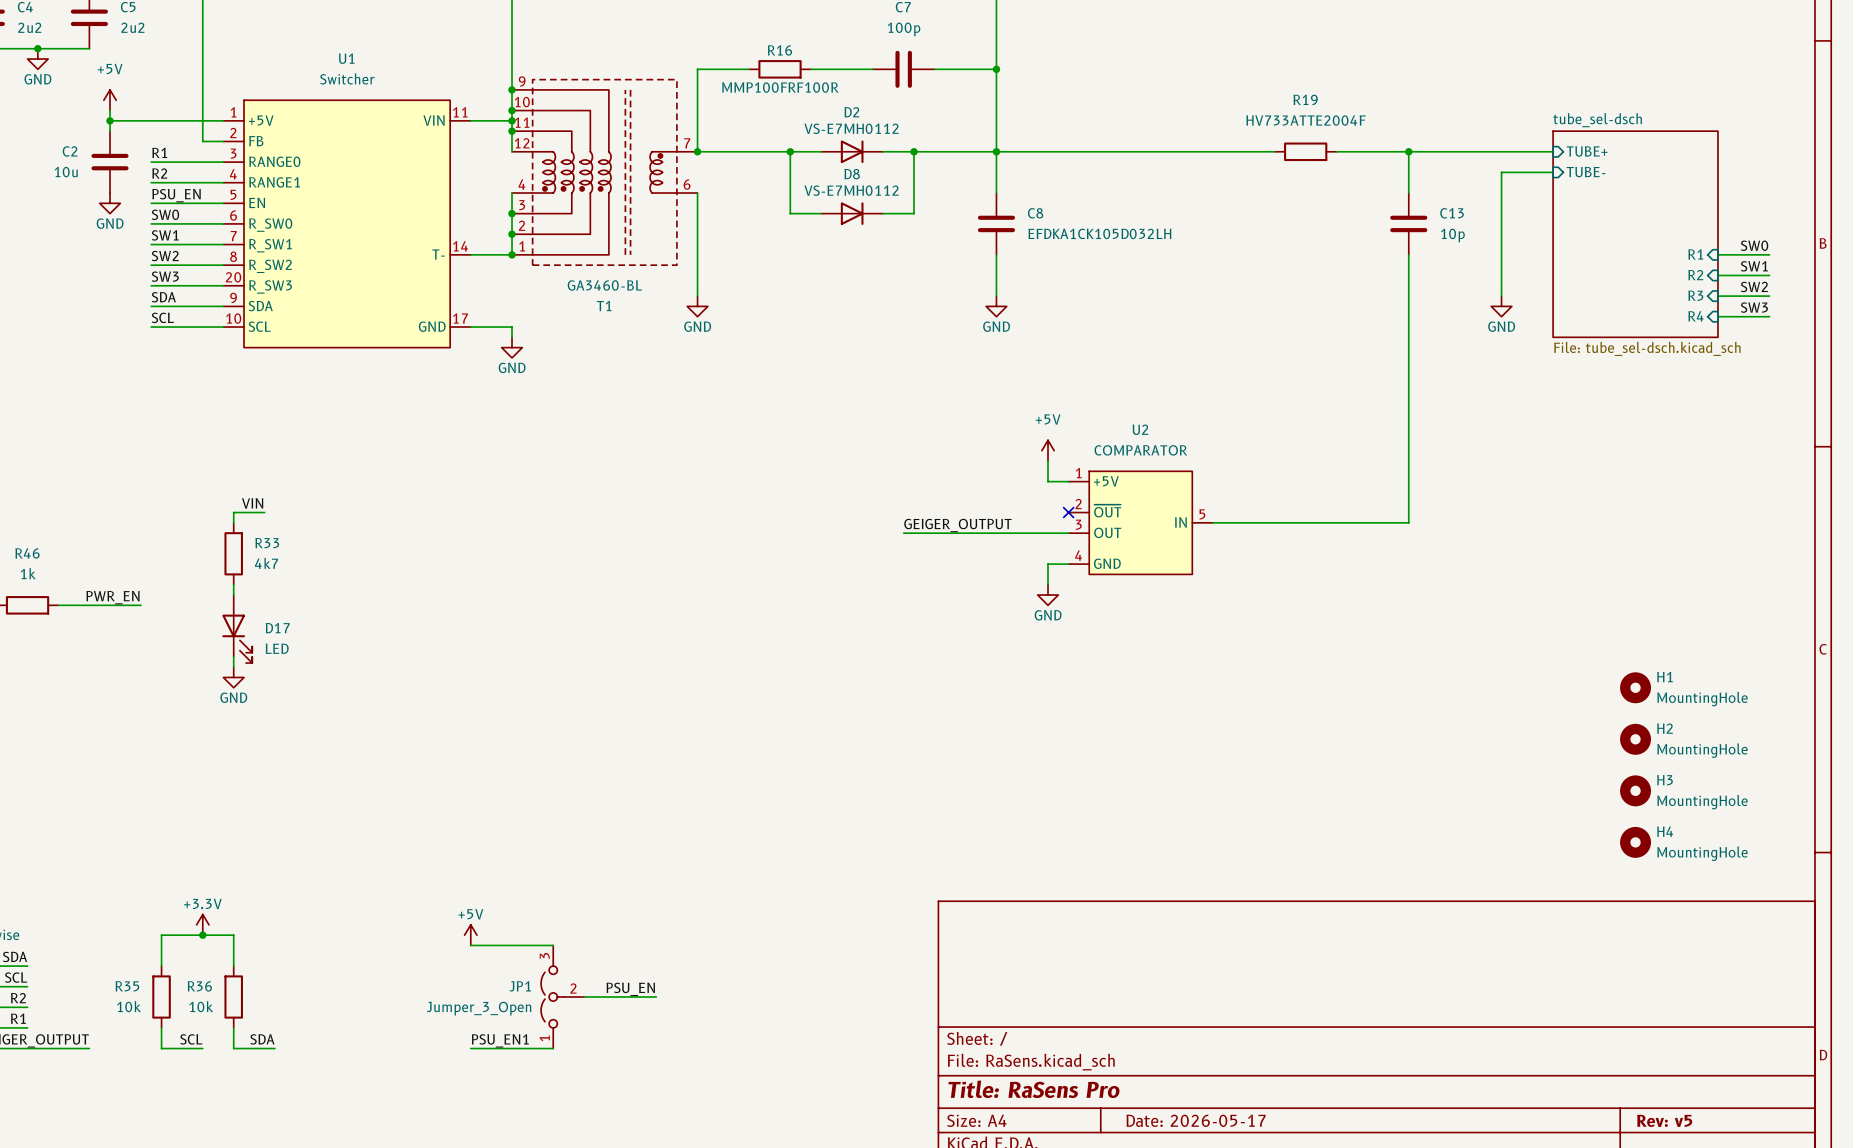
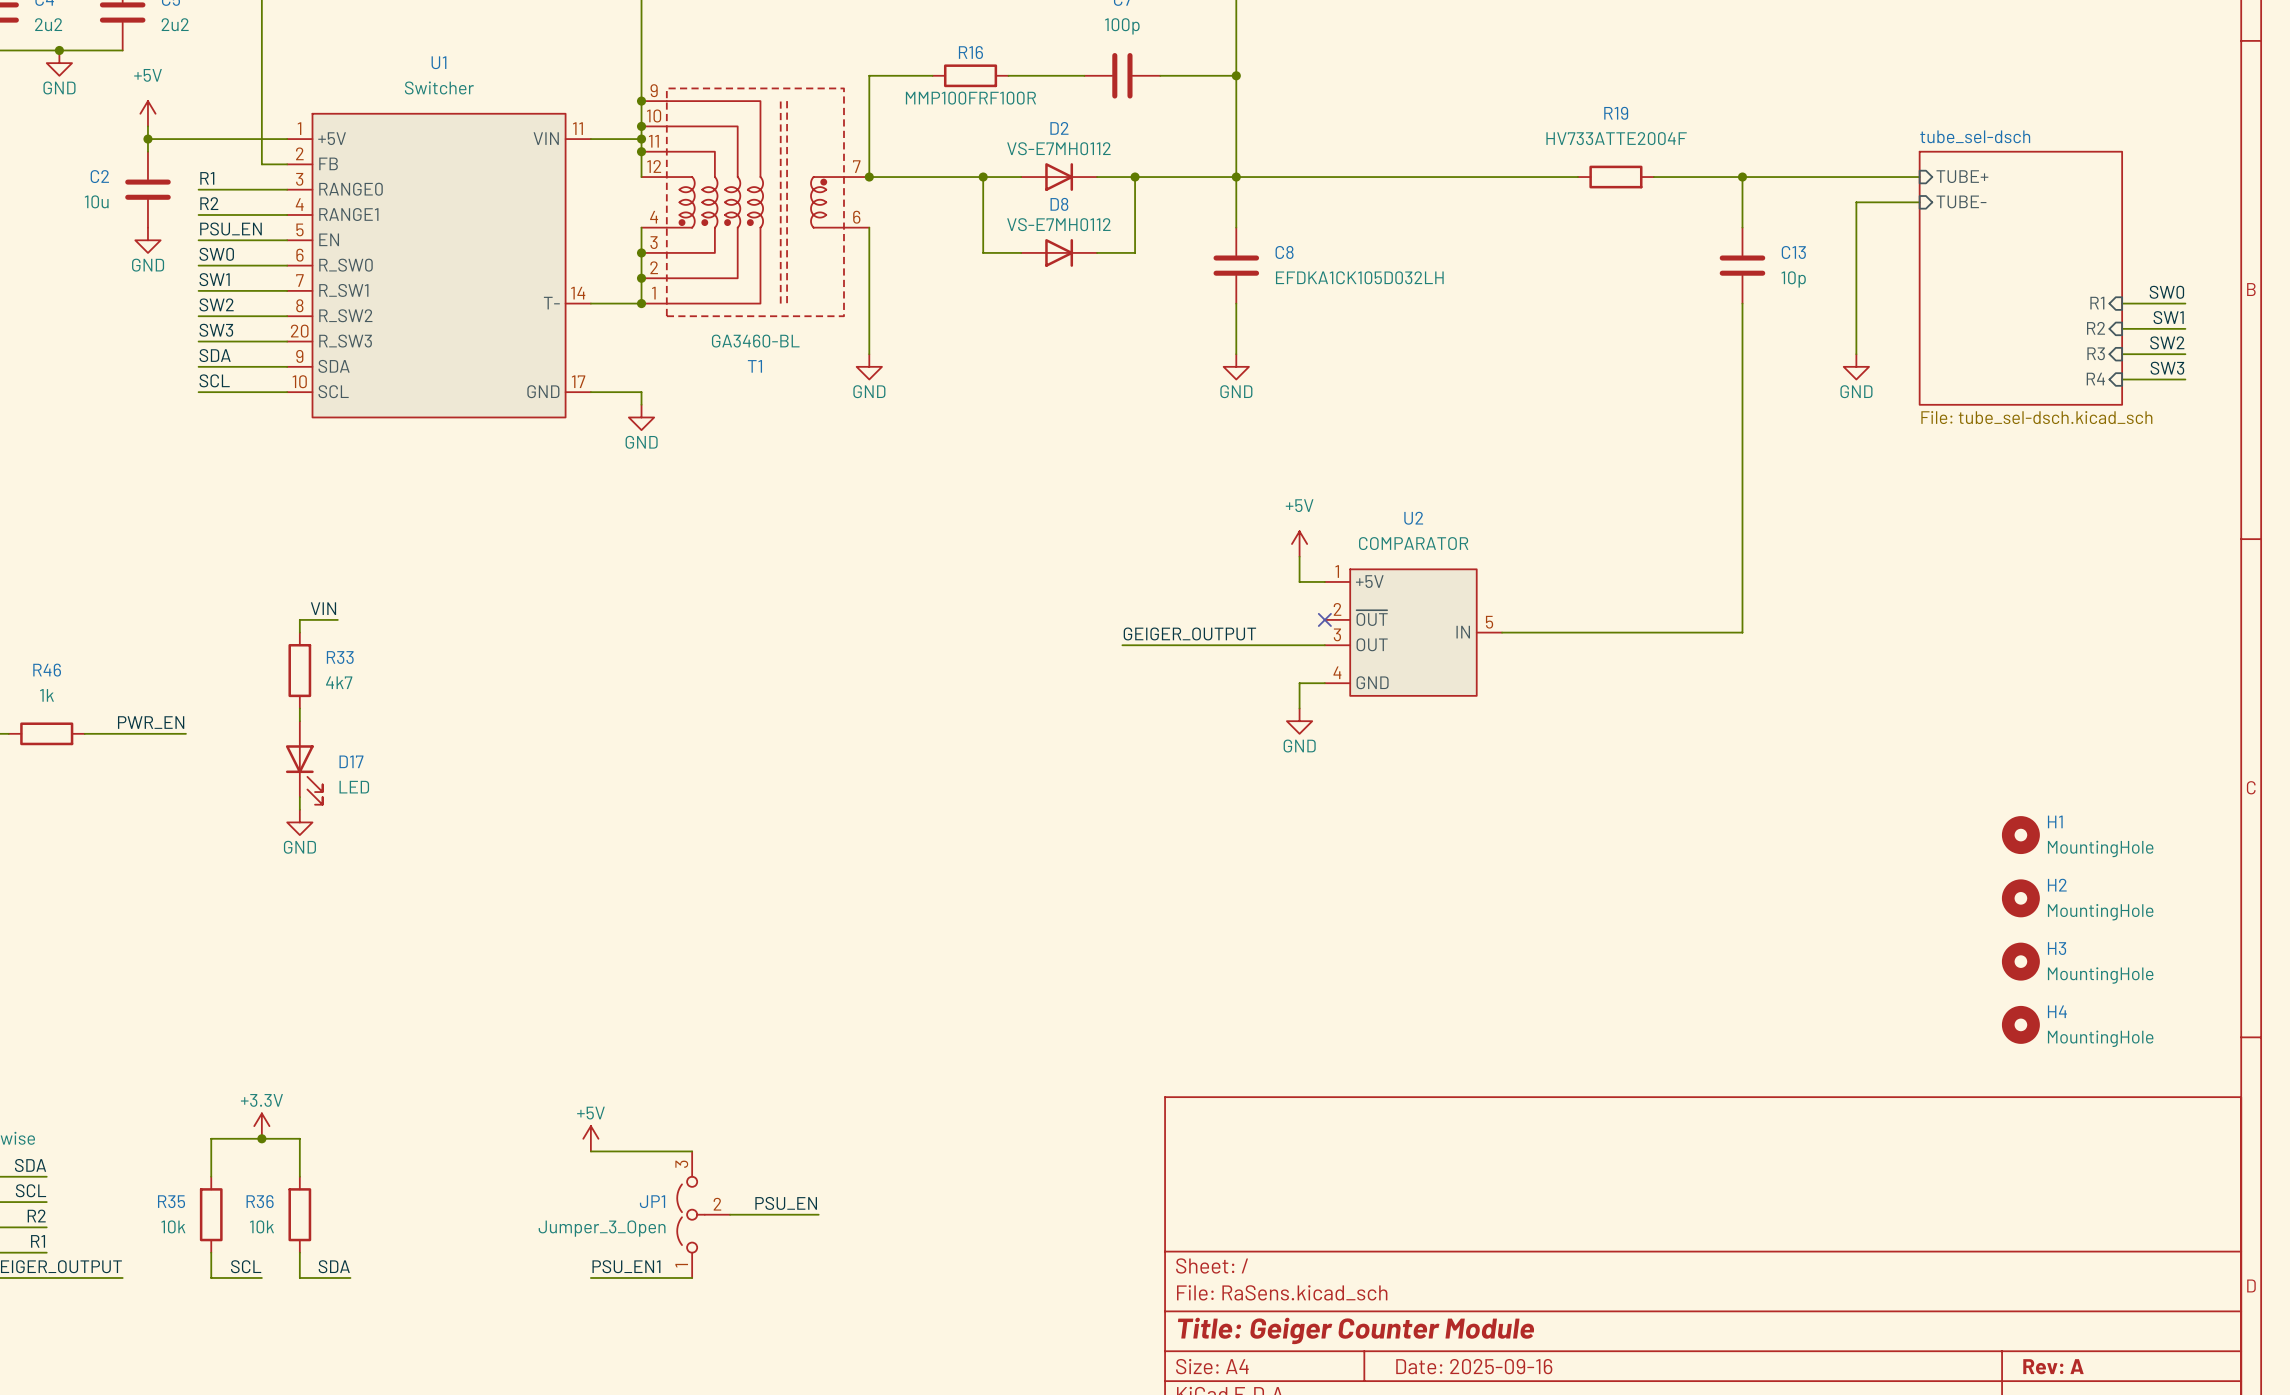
title block: Title: RaSens Pro (1034, 1089) -> Title: Geiger Counter Module (1355, 1330)
title block: Date: 2026-05-17 (1196, 1120) -> Date: 2025-09-16 (1474, 1366)
title block: Rev: v5 (1664, 1120) -> Rev: A (2053, 1366)

